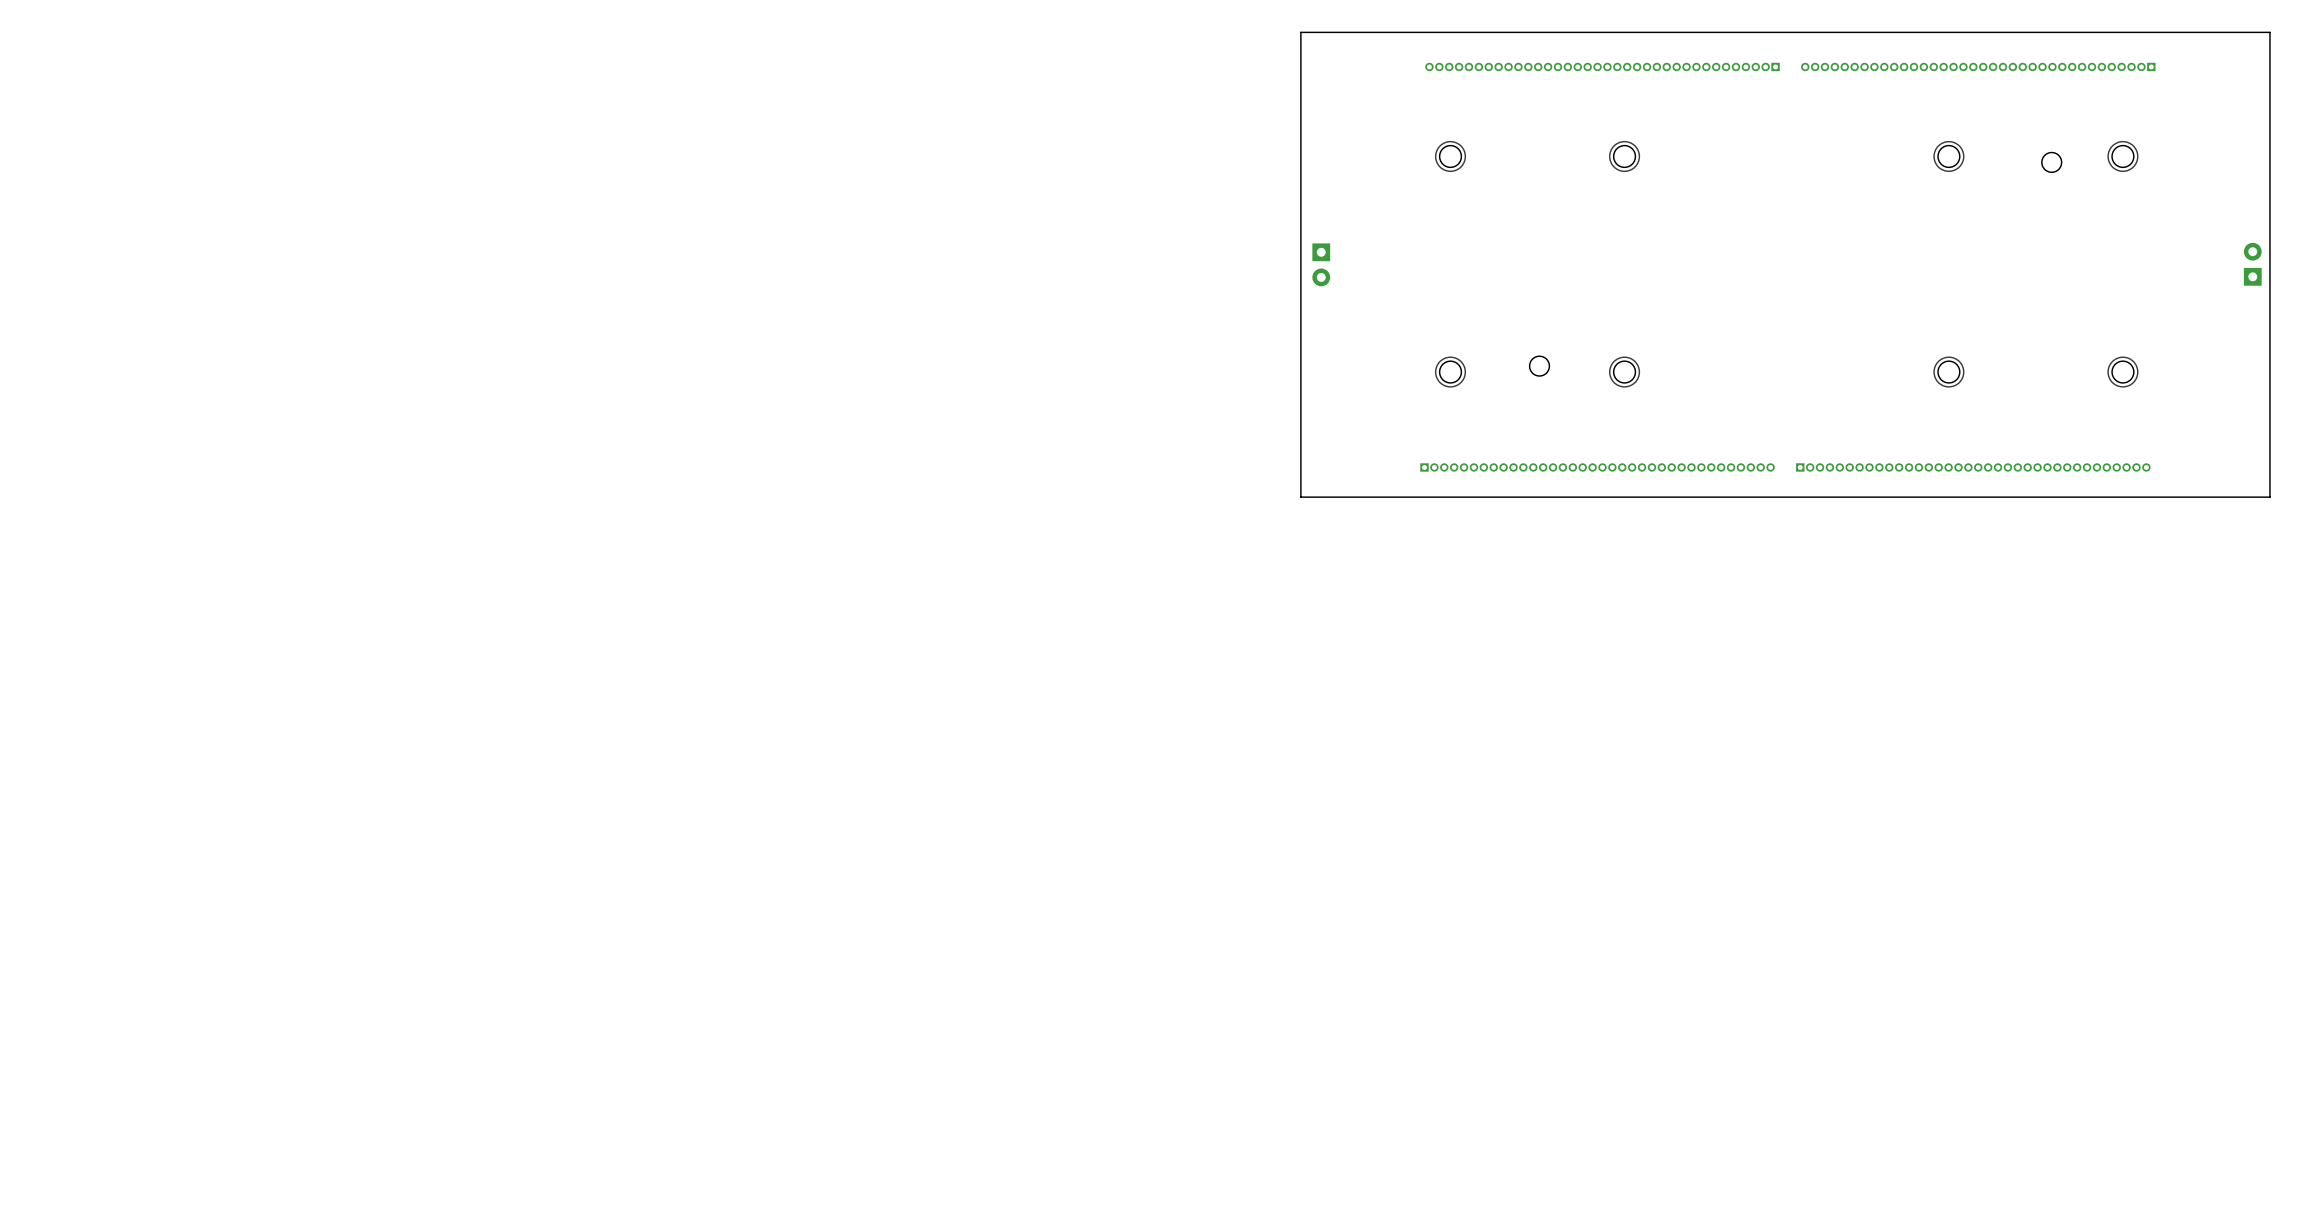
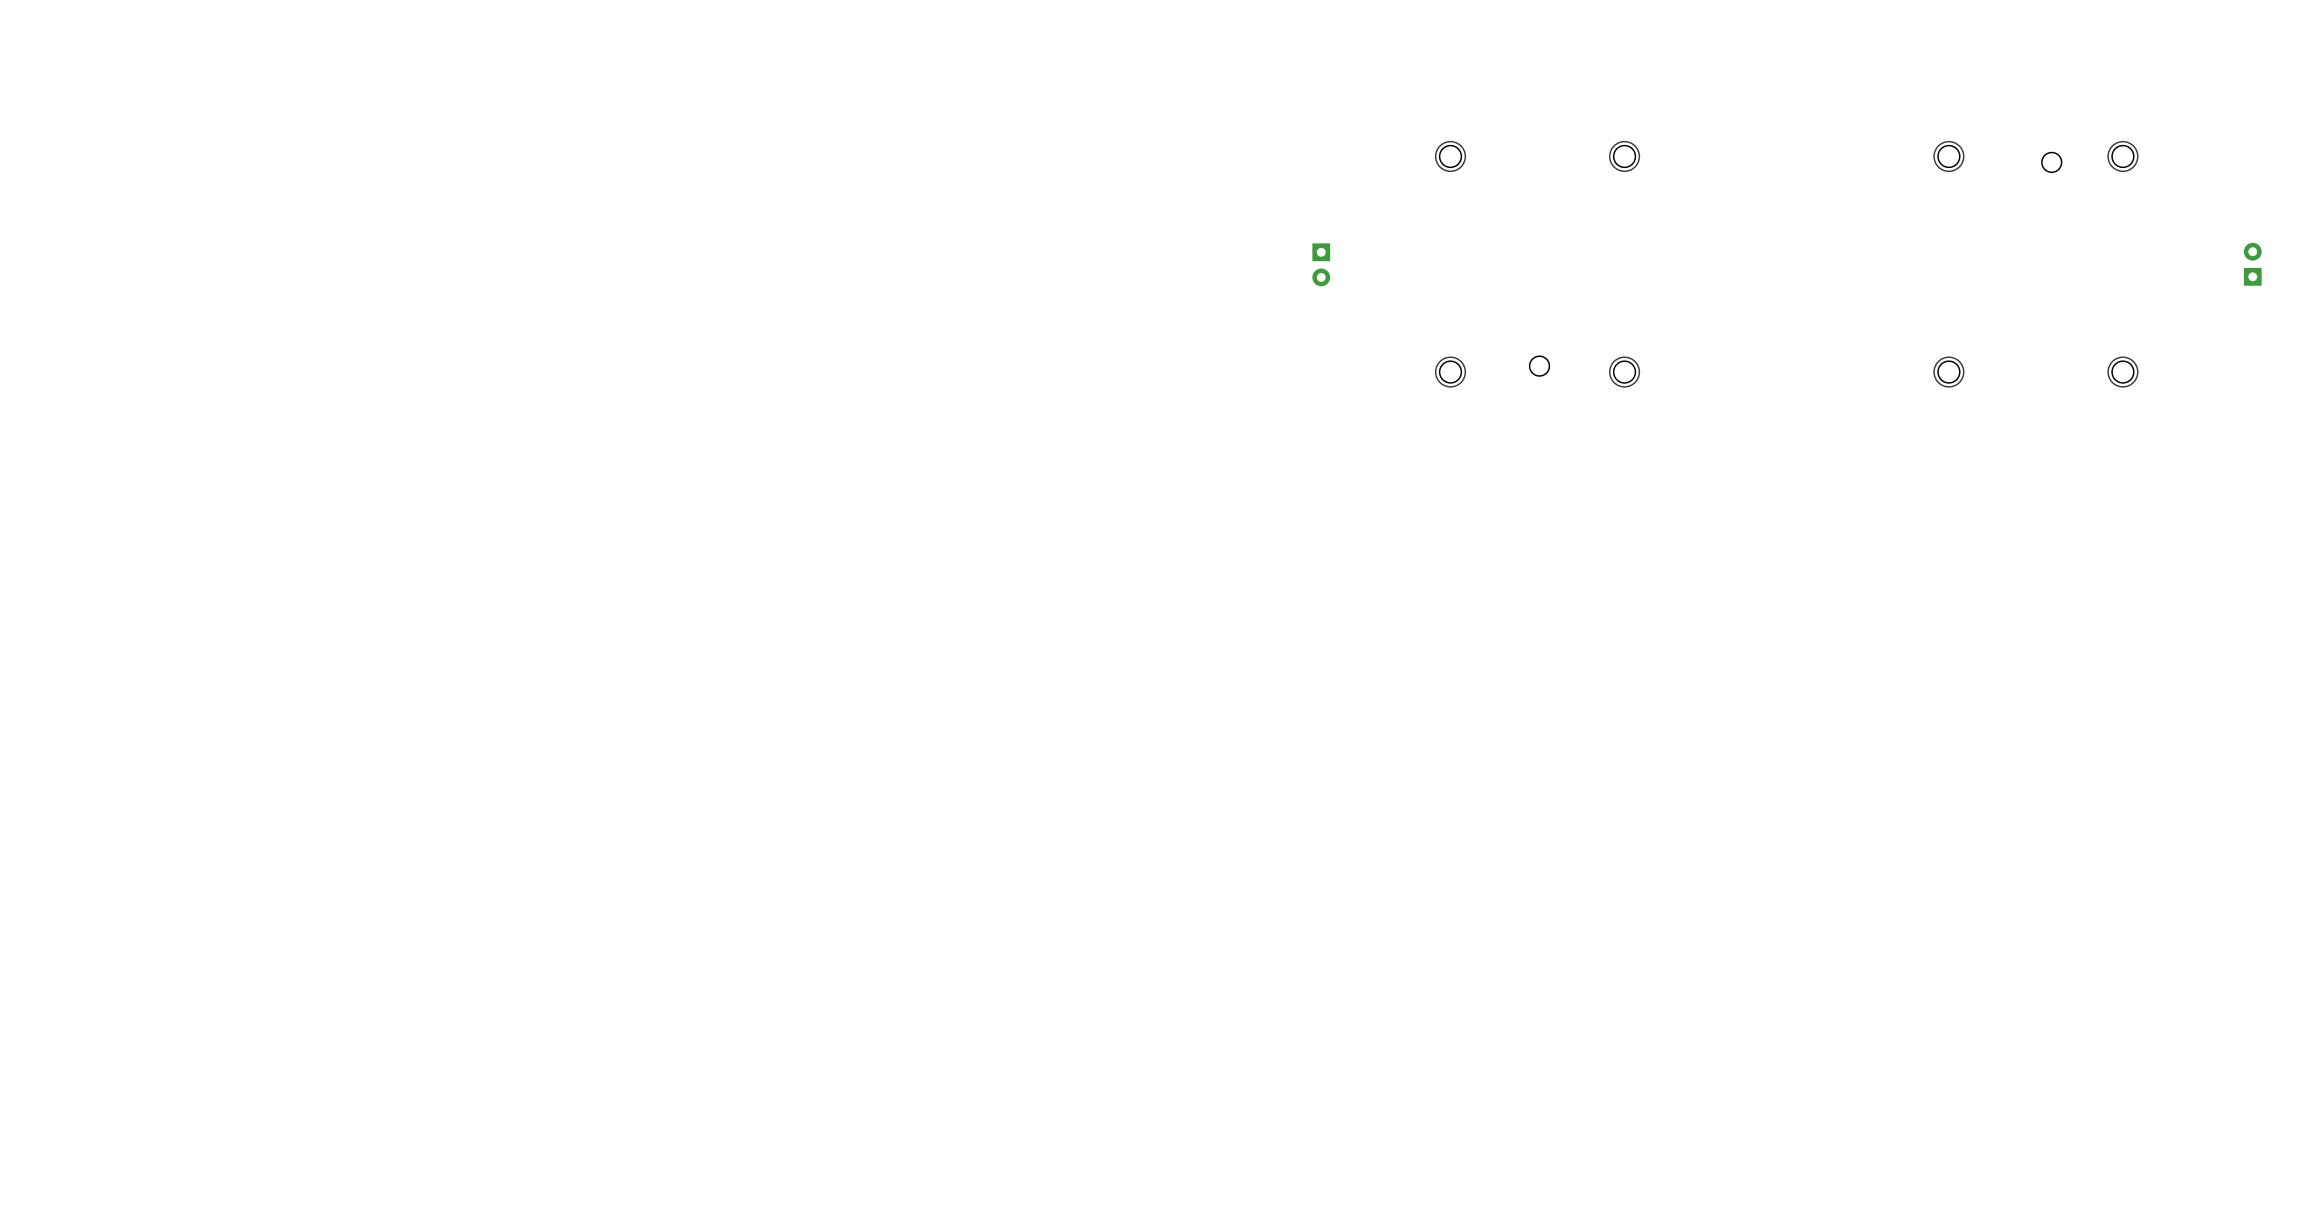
board edge: (2269, 32) (1300, 32) (1300, 497) (2269, 497) (2269, 32) -> none
part: (1602, 66) -> none
part: (1978, 66) -> none
part: (1597, 467) -> none
part: (1973, 467) -> none

